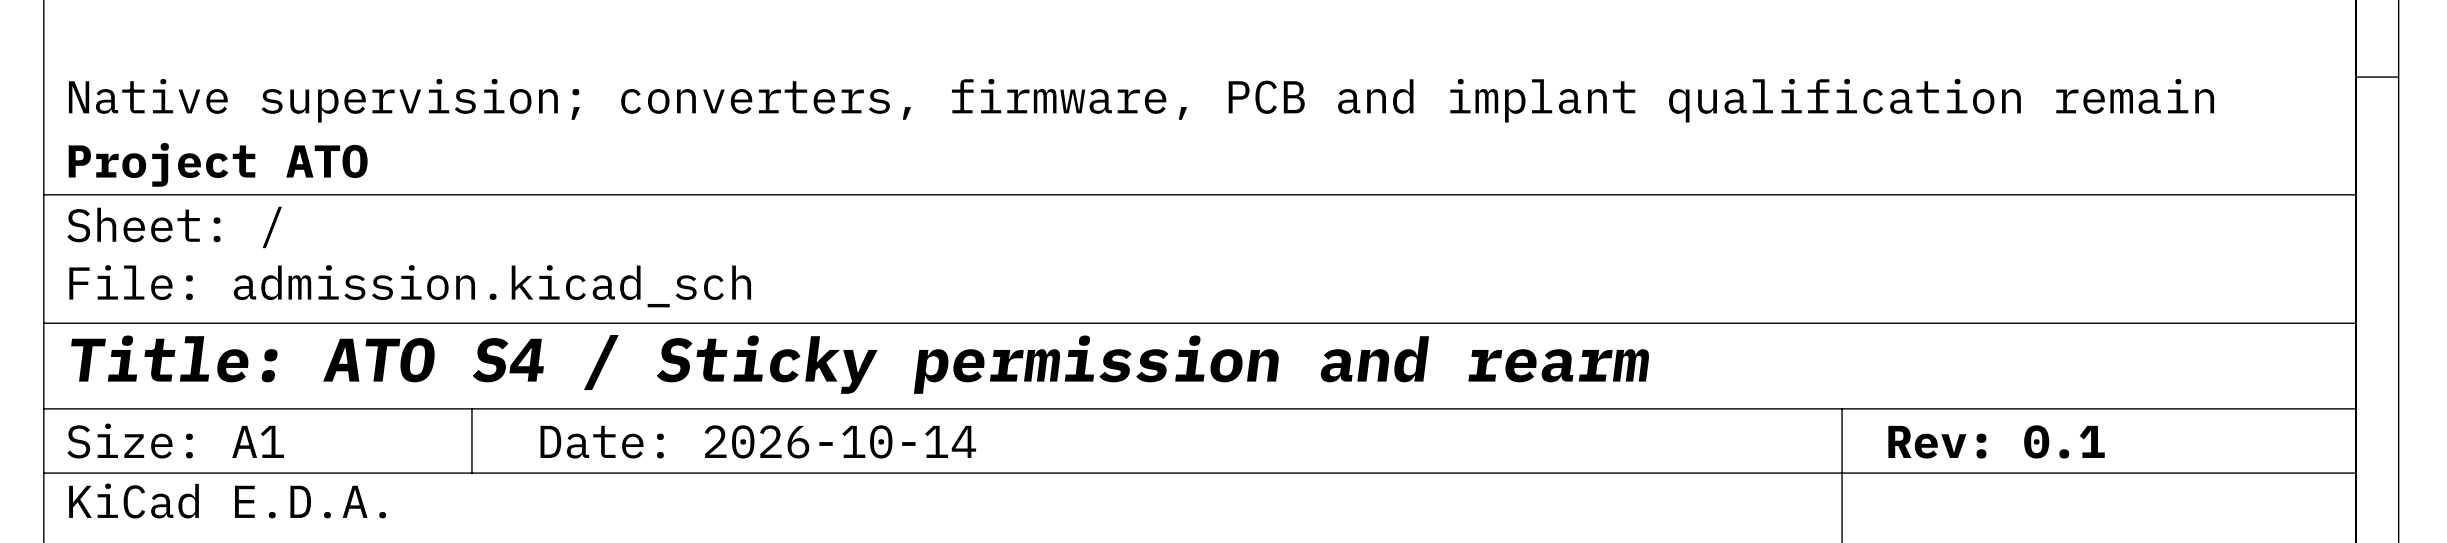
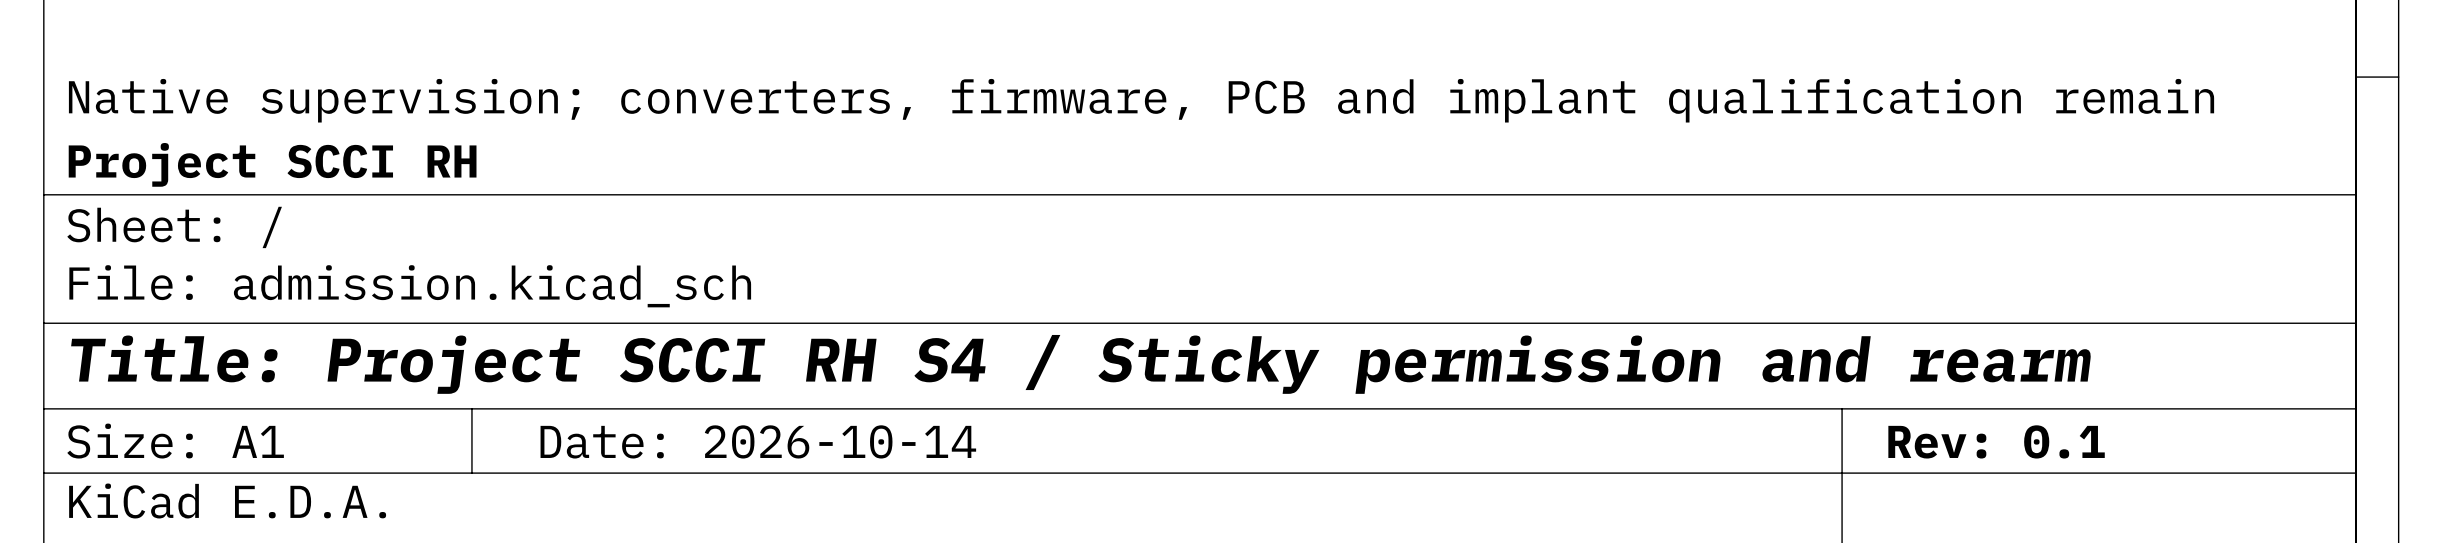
title block: Project ATO (218, 164) -> Project SCCI RH (272, 164)
title block: Title: ATO S4 / Sticky permission and rearm (860, 364) -> Title: Project SCCI RH S4 / Sticky permission and rearm (1081, 364)

